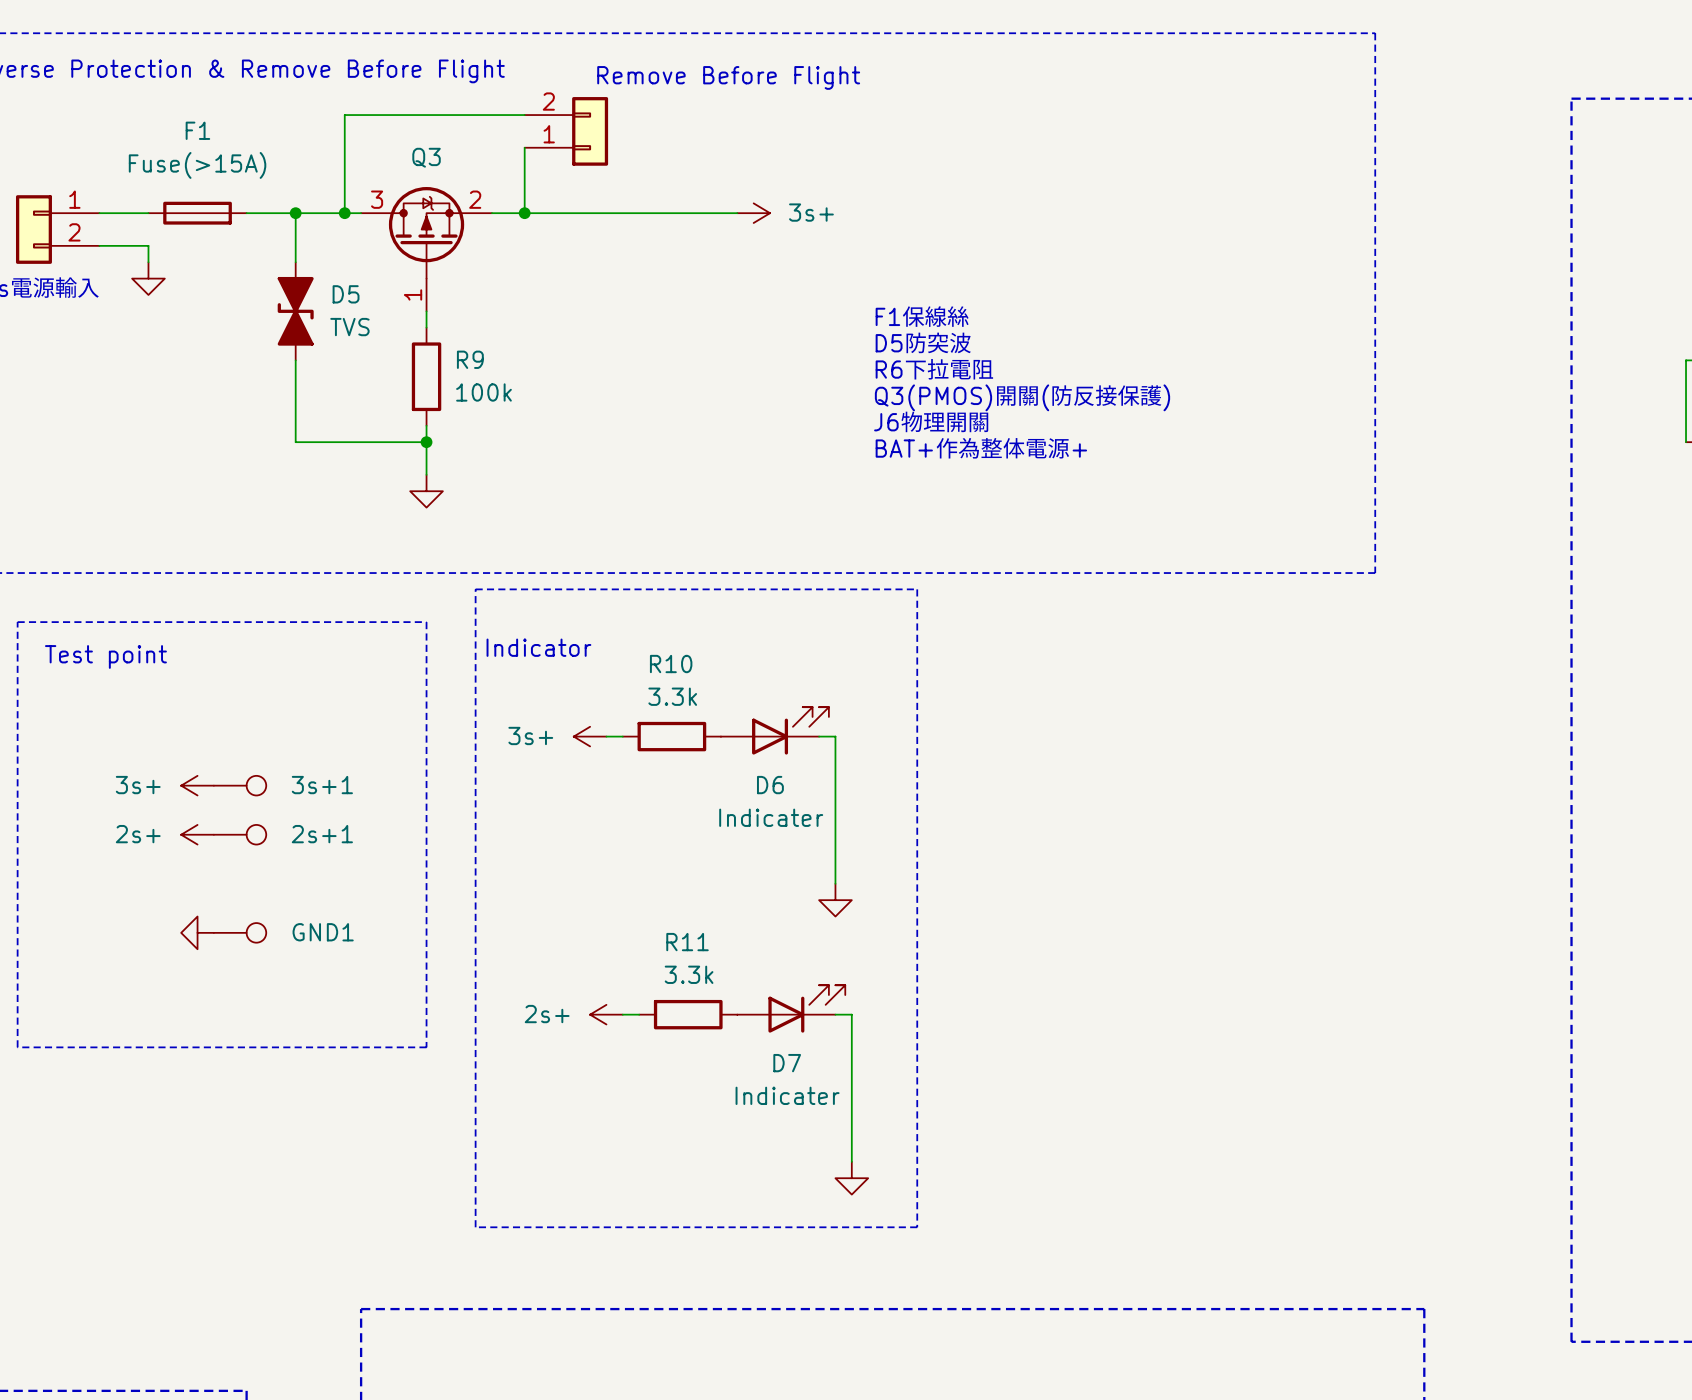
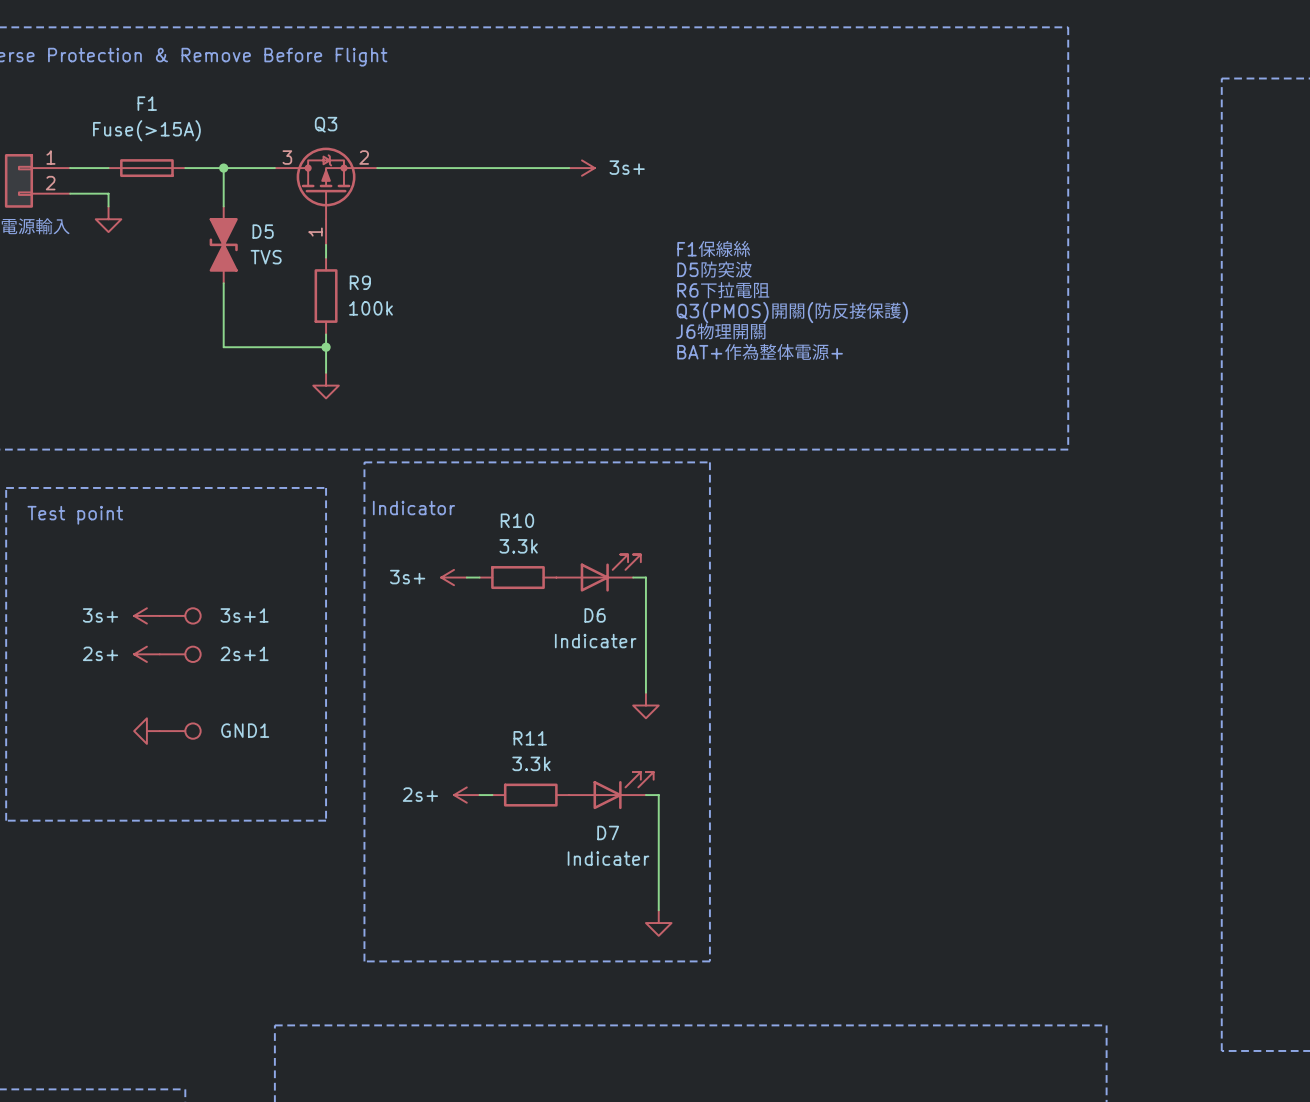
text: Remove Before Flight (728, 77) -> none
wire: (524, 115) (344, 115) (344, 213) -> none
part: (566, 131) -> none
wire: (524, 147) (524, 213) -> none
junction: (344, 213) -> none
junction: (524, 213) -> none

